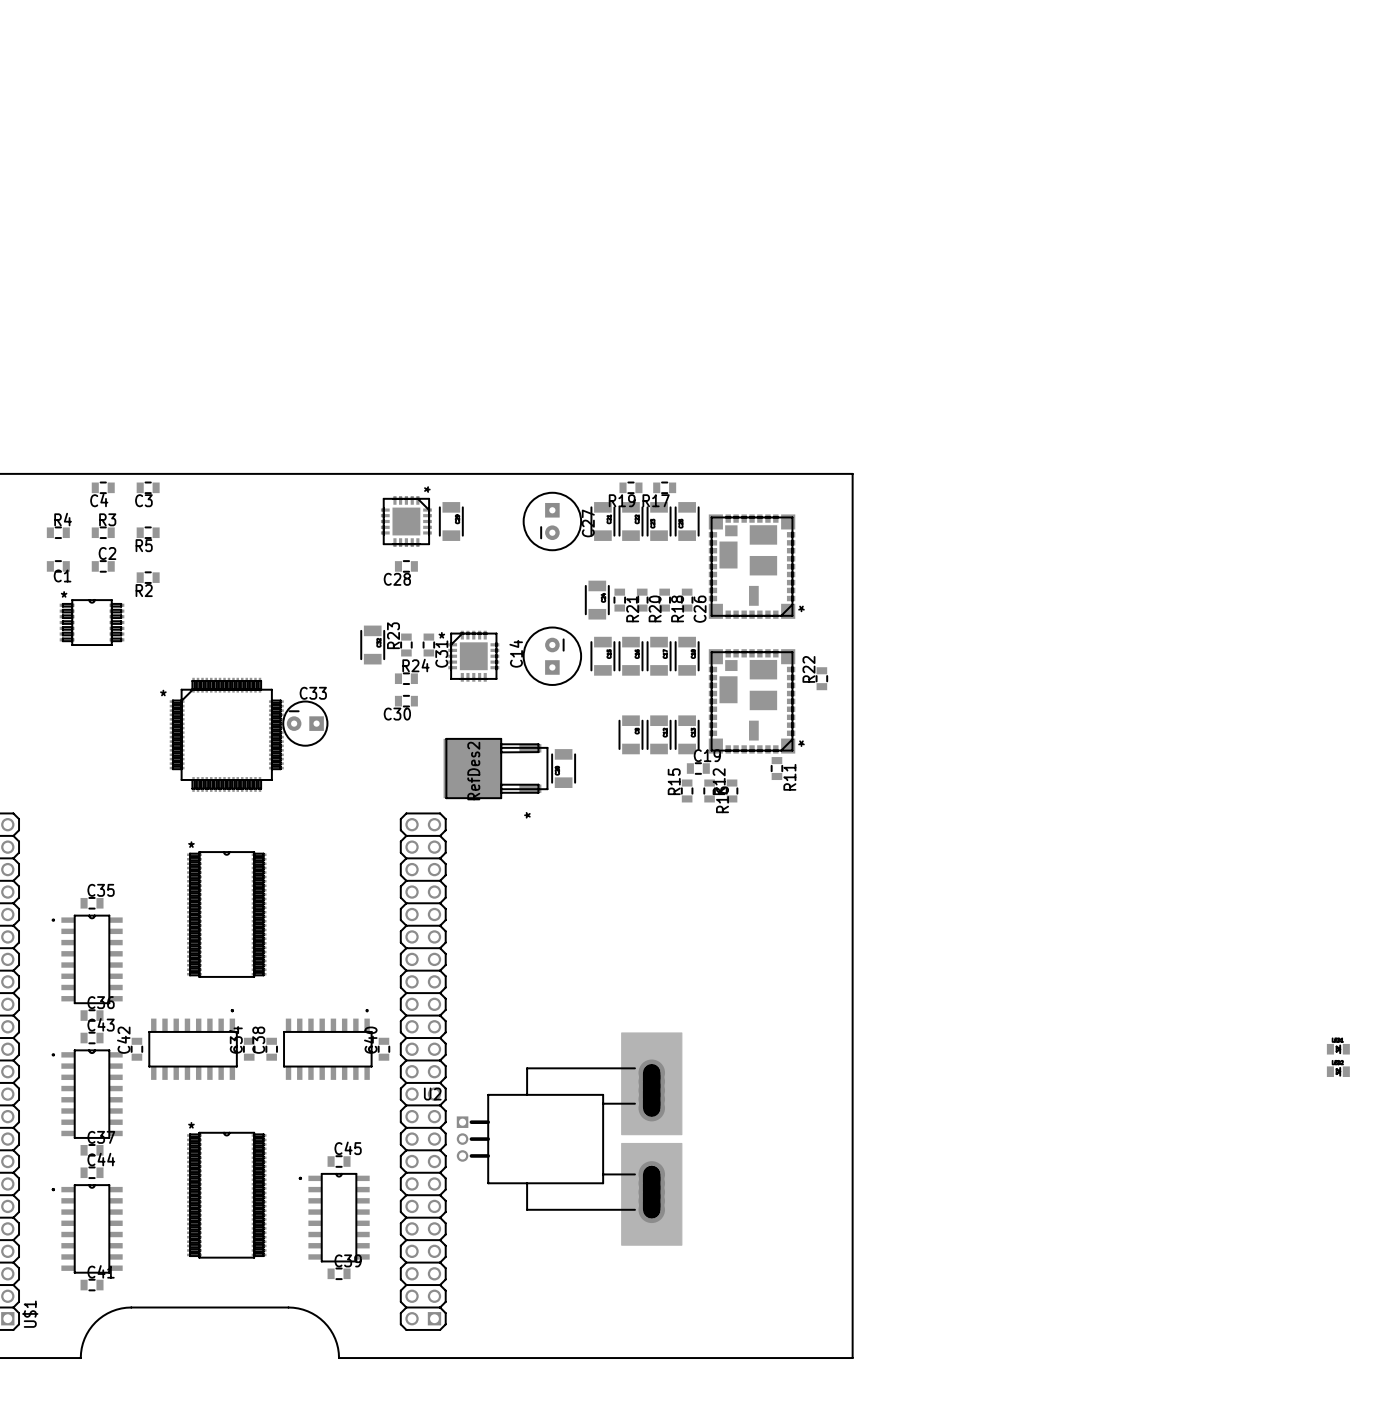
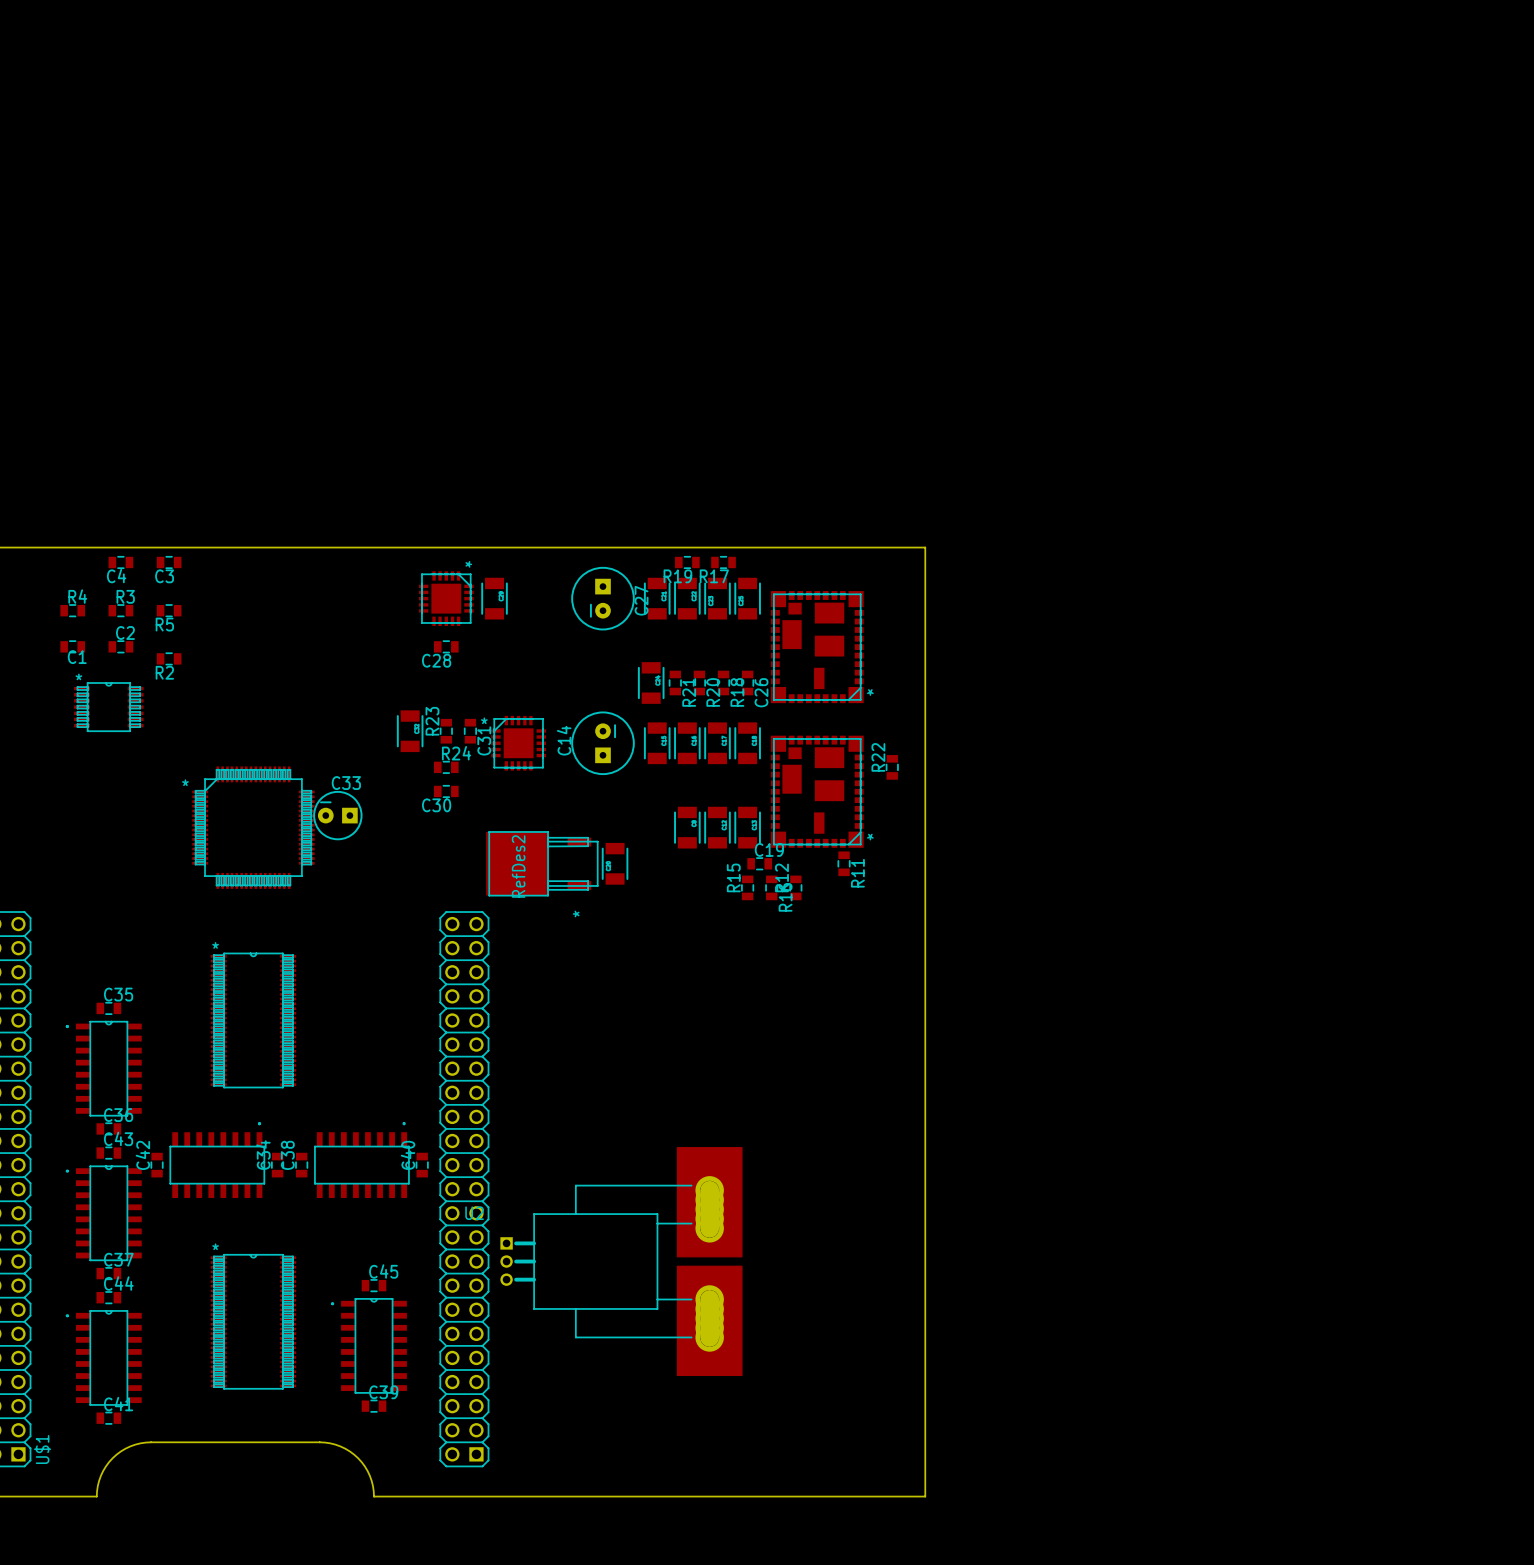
part: (1338, 1049) -> none
part: (1338, 1071) -> none

